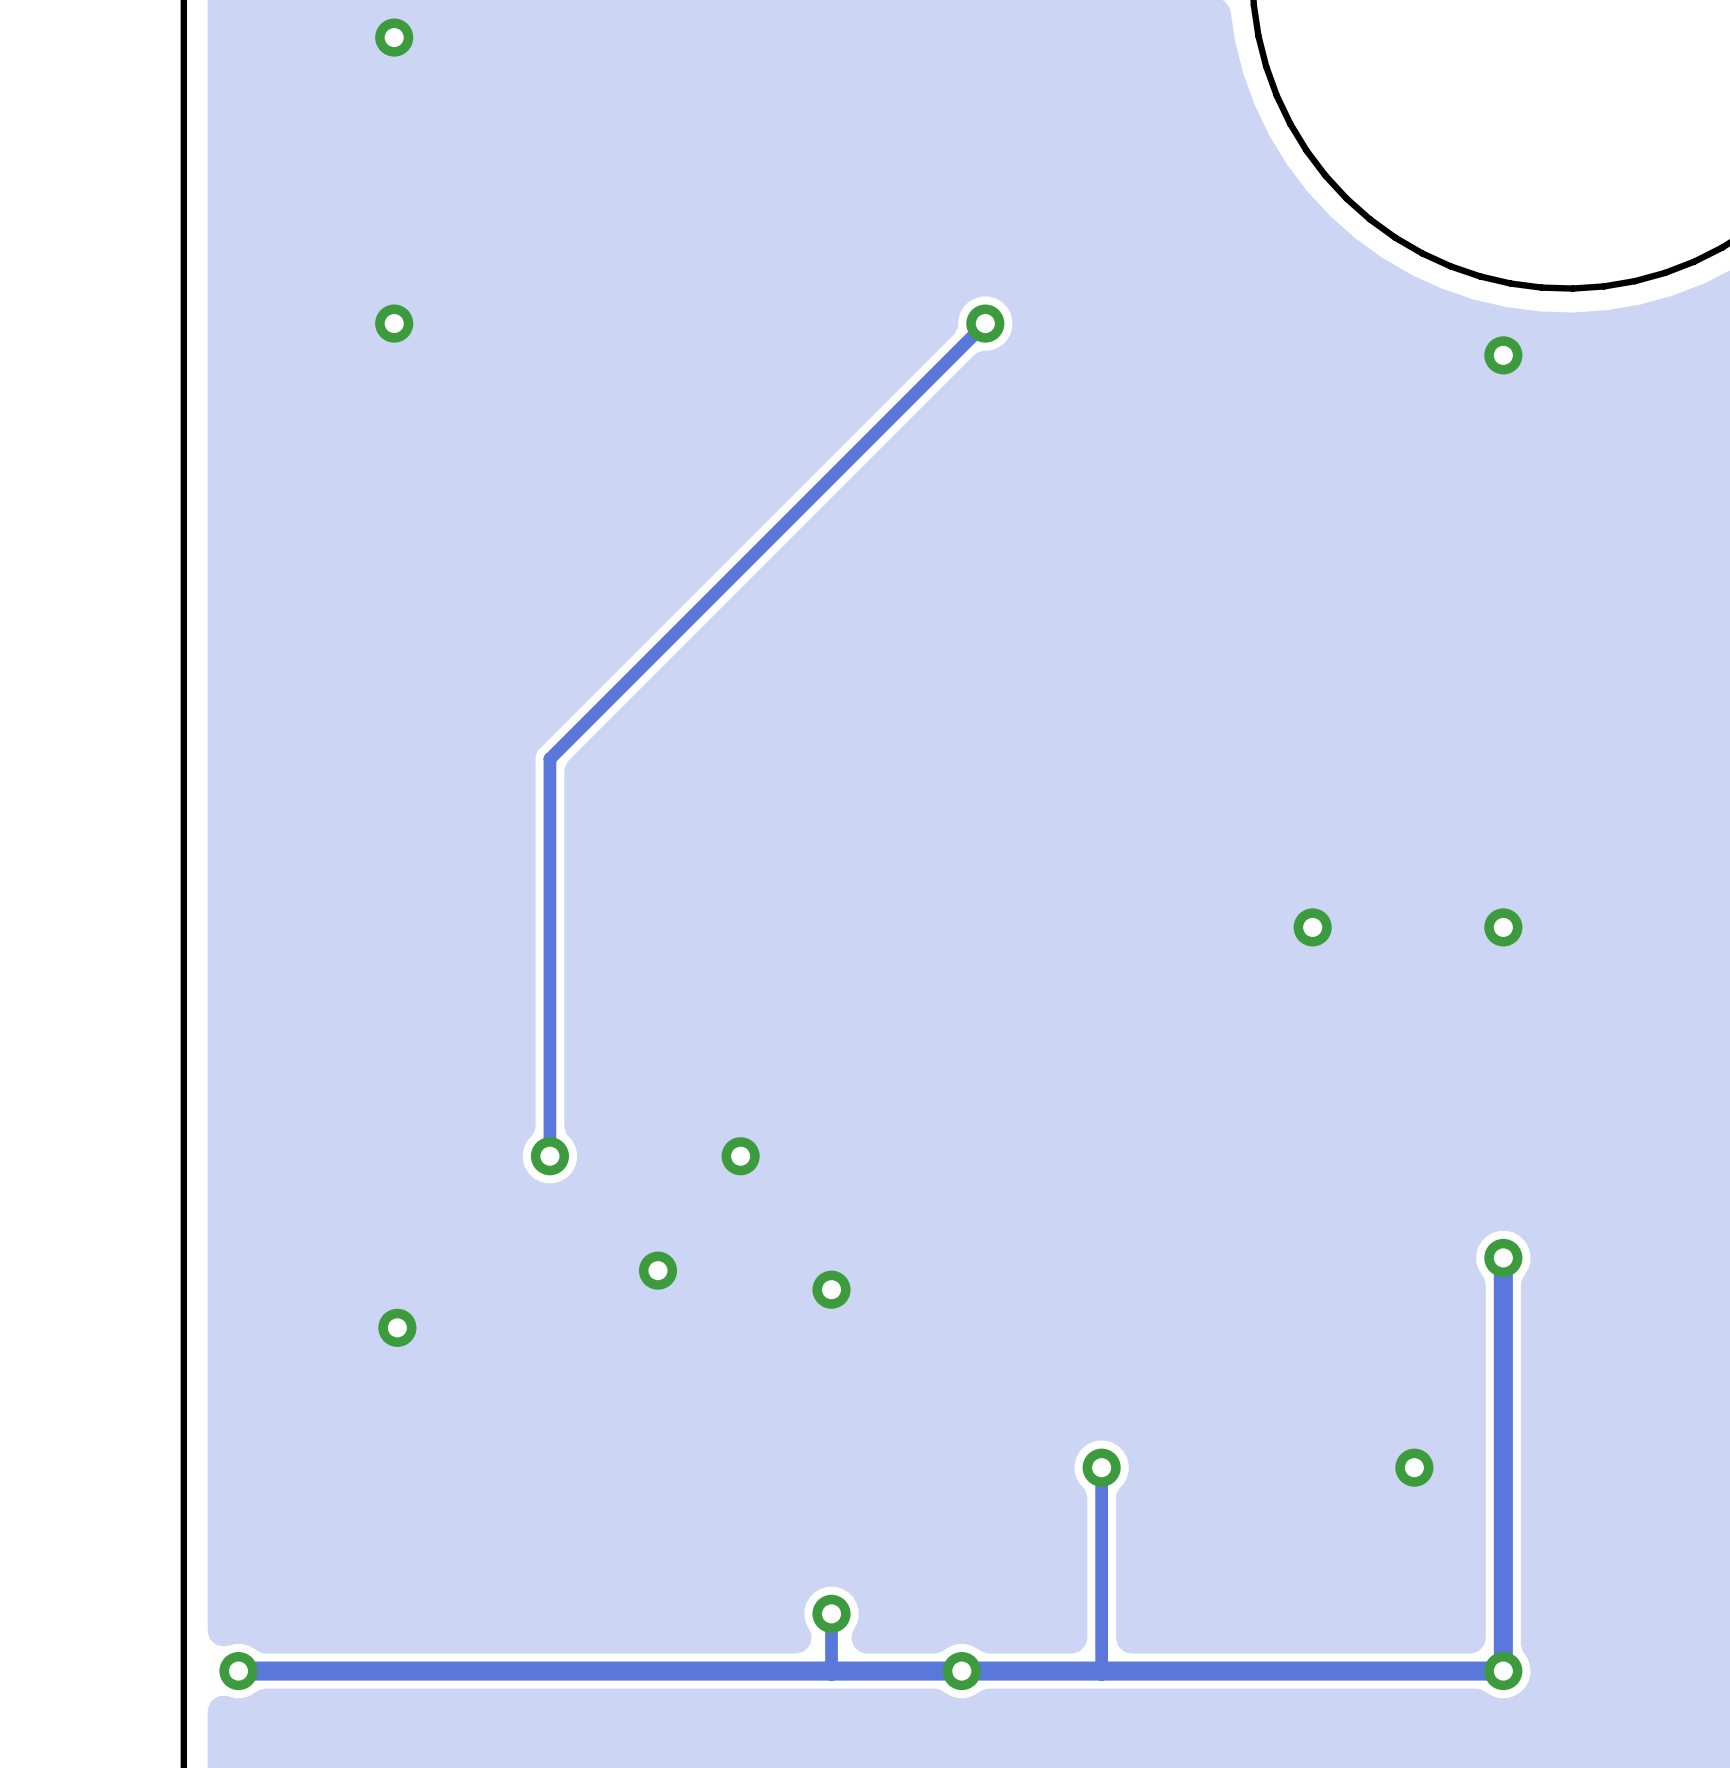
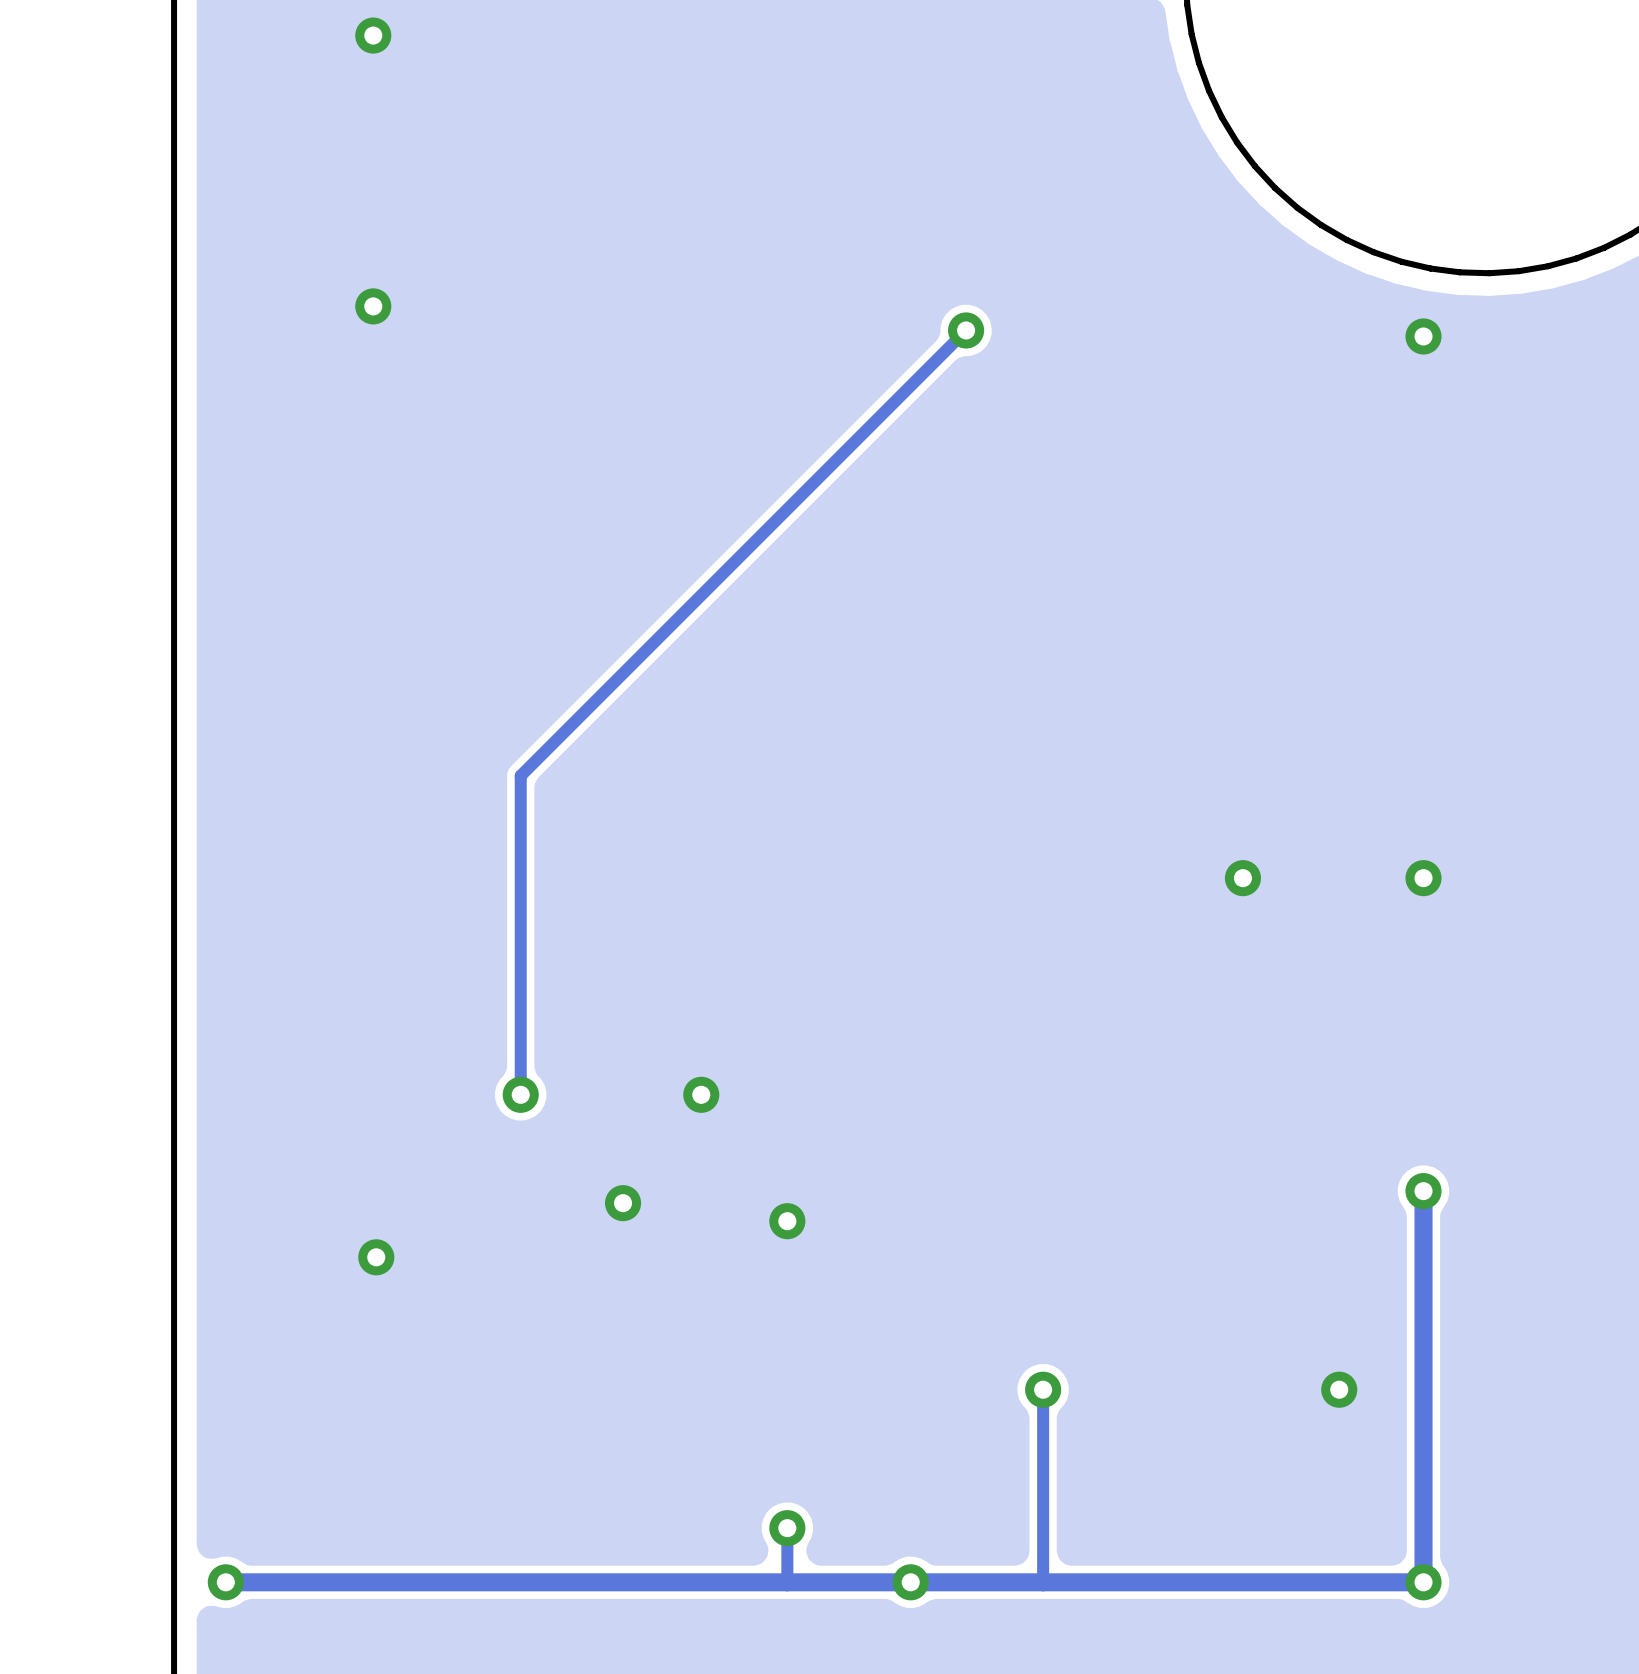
track: (985, 323) (549, 758) (549, 819) -> (966, 330) (520, 775)
via position: (985, 323) -> (966, 330)

